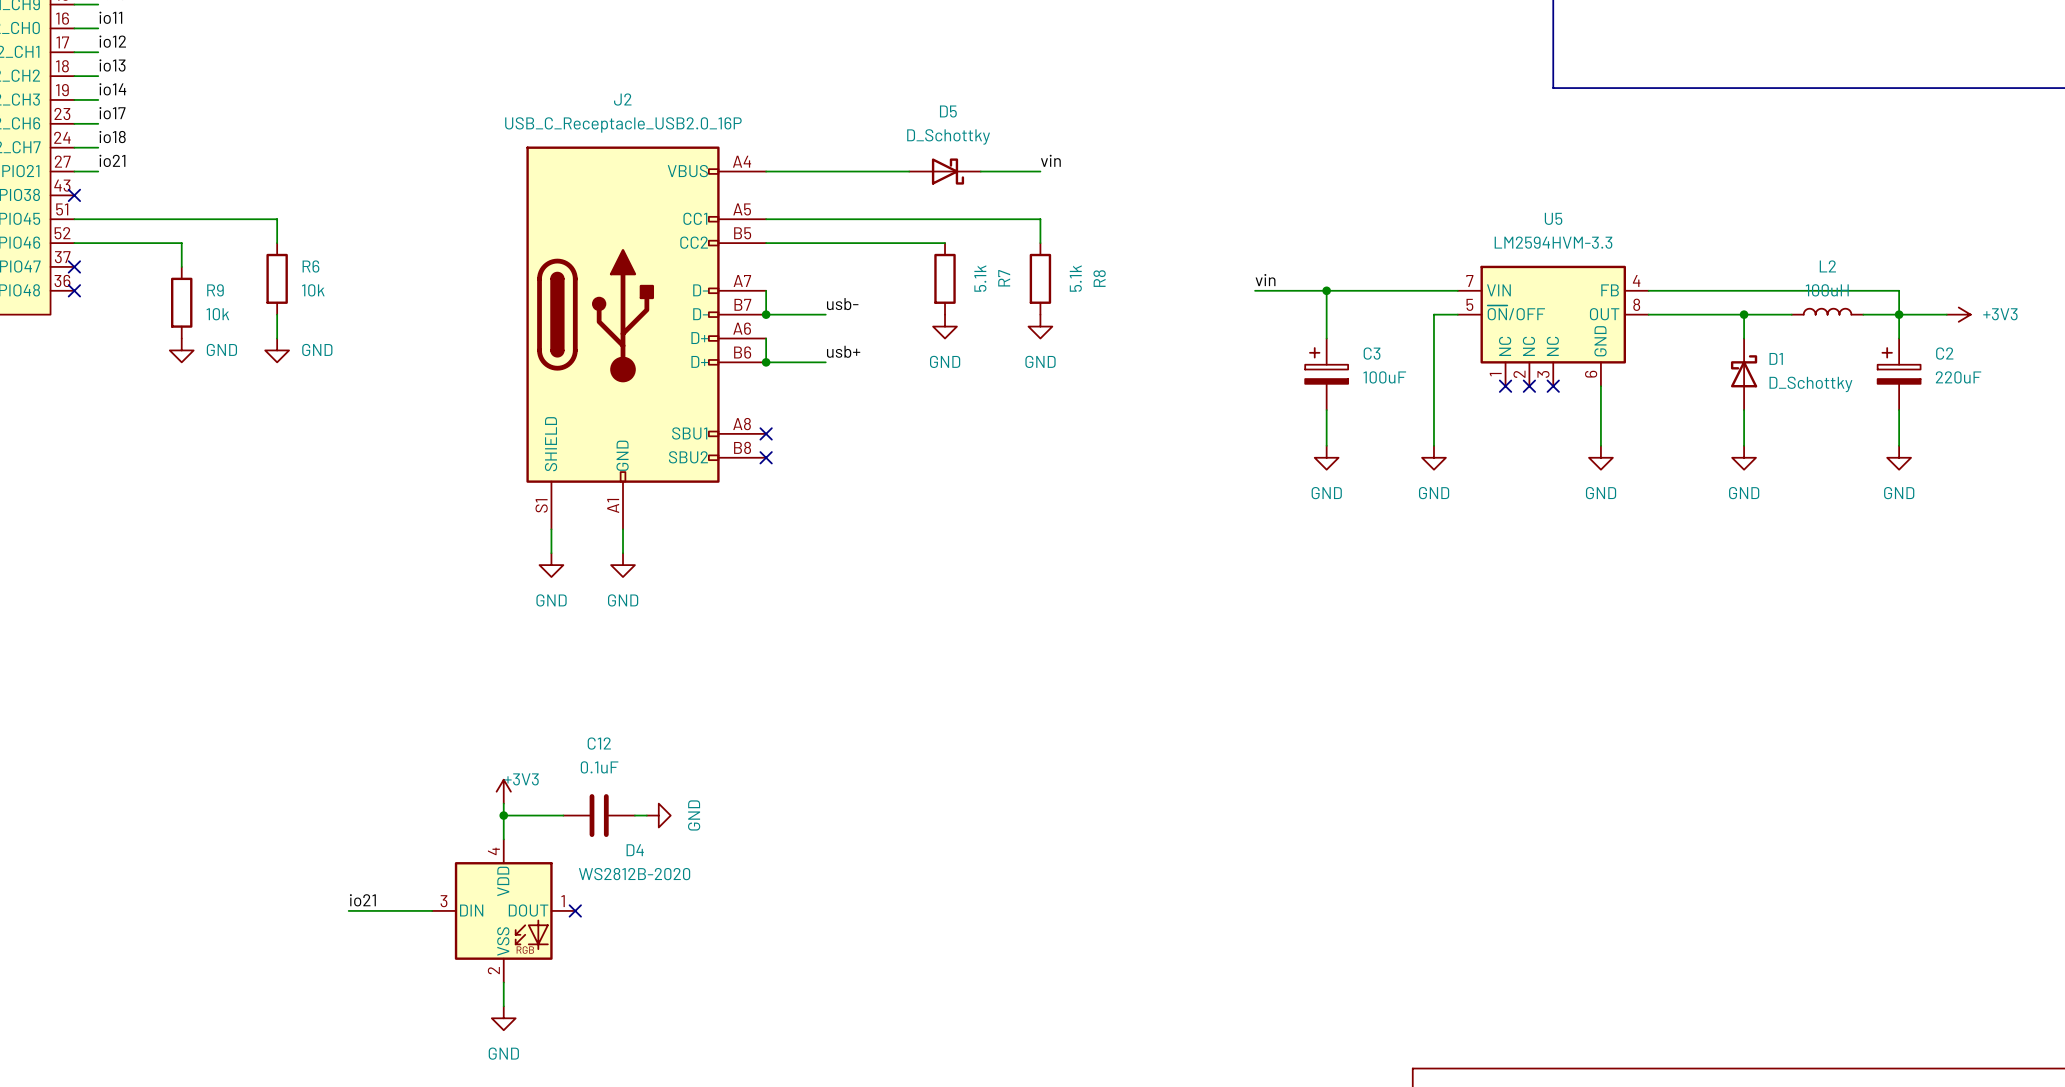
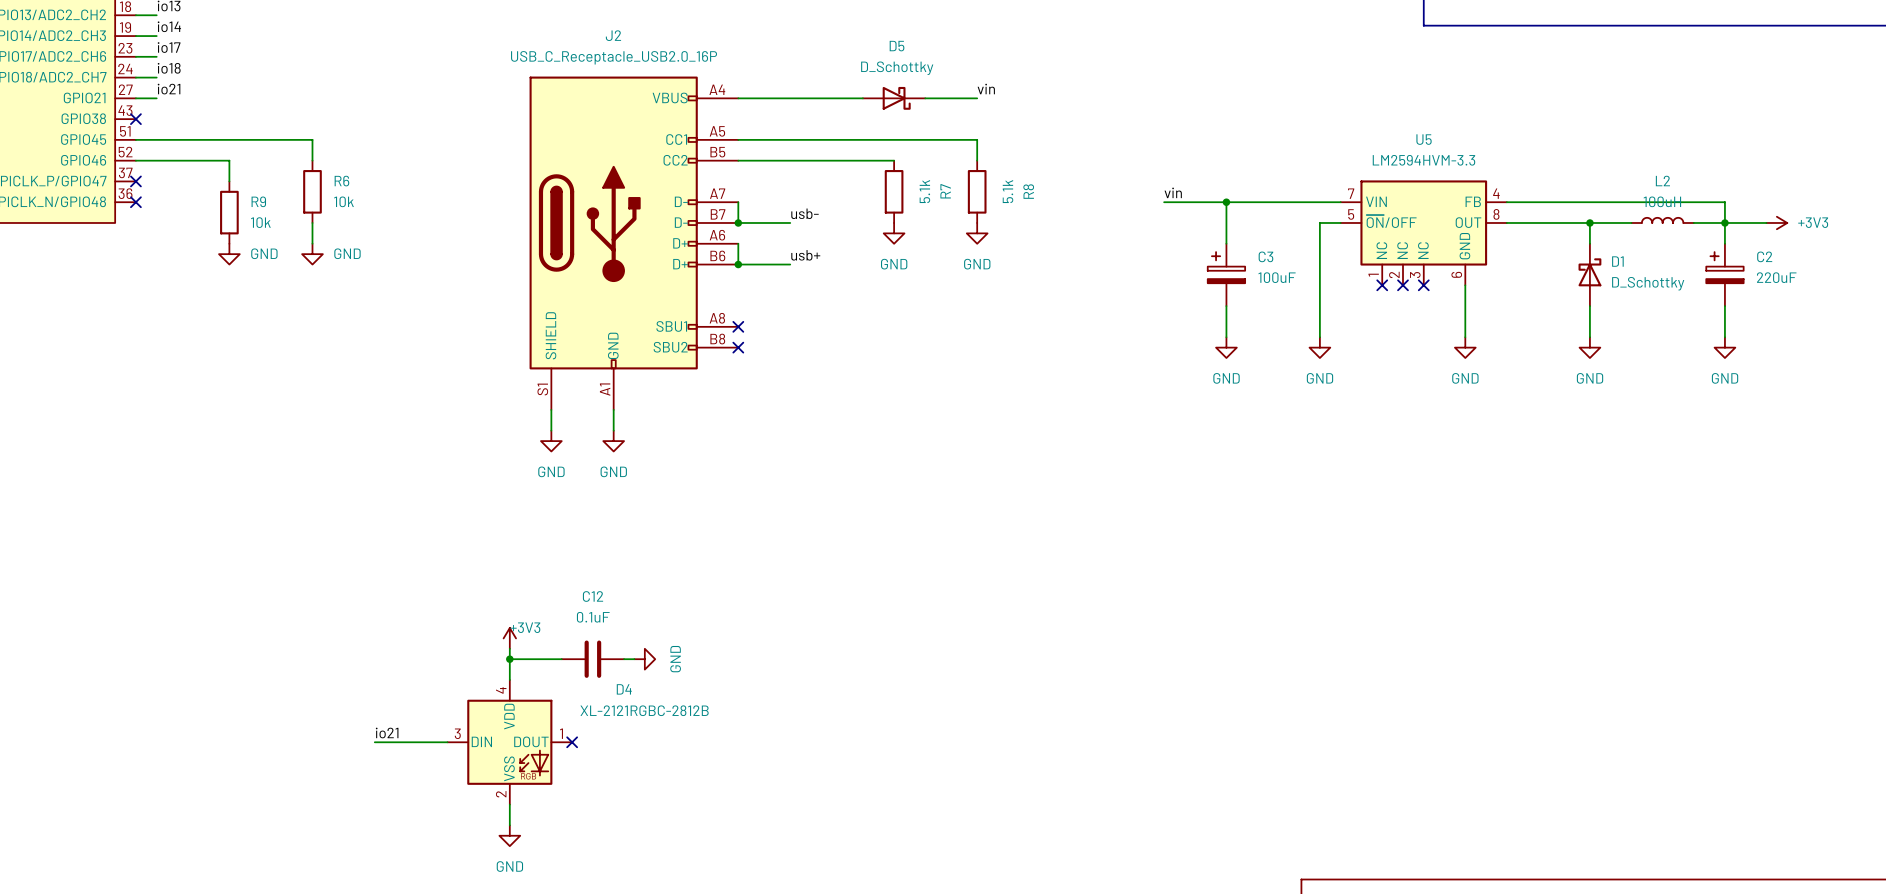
D4 value: WS2812B-2020 (634, 874) -> XL-2121RGBC-2812B (644, 710)

